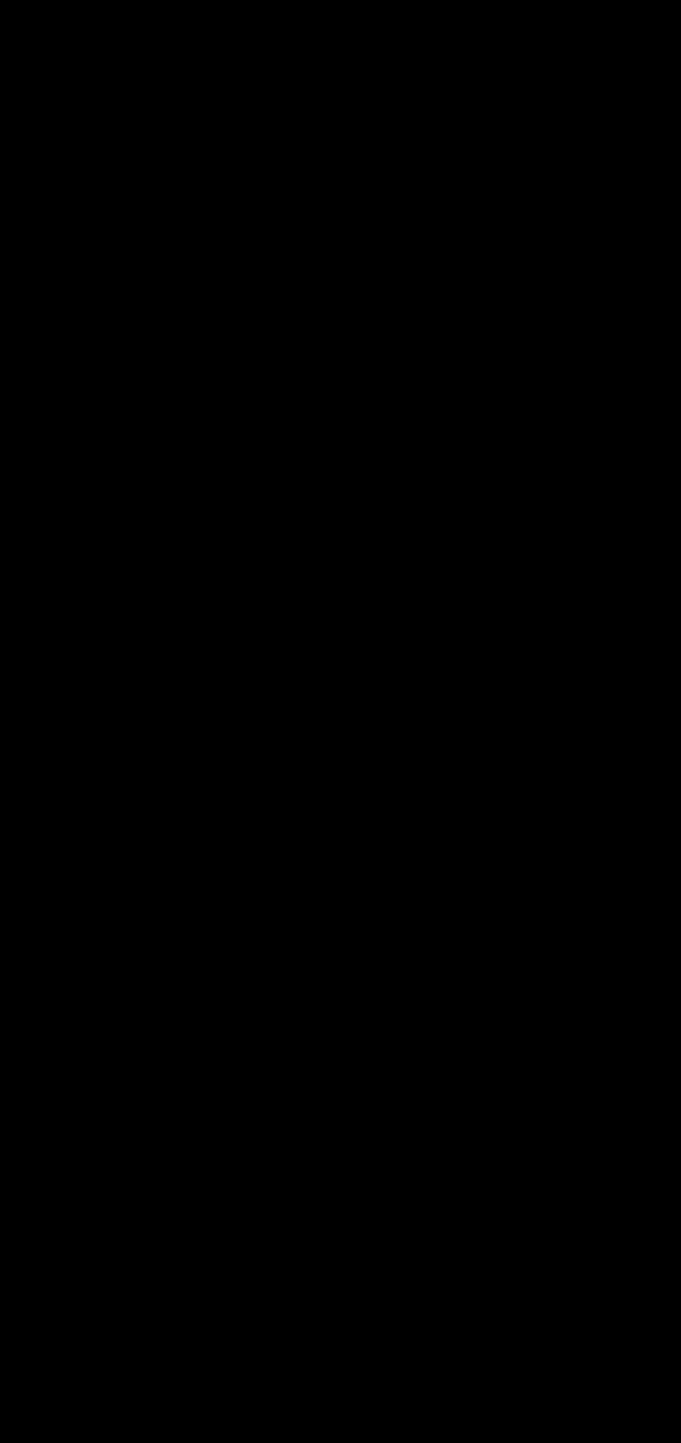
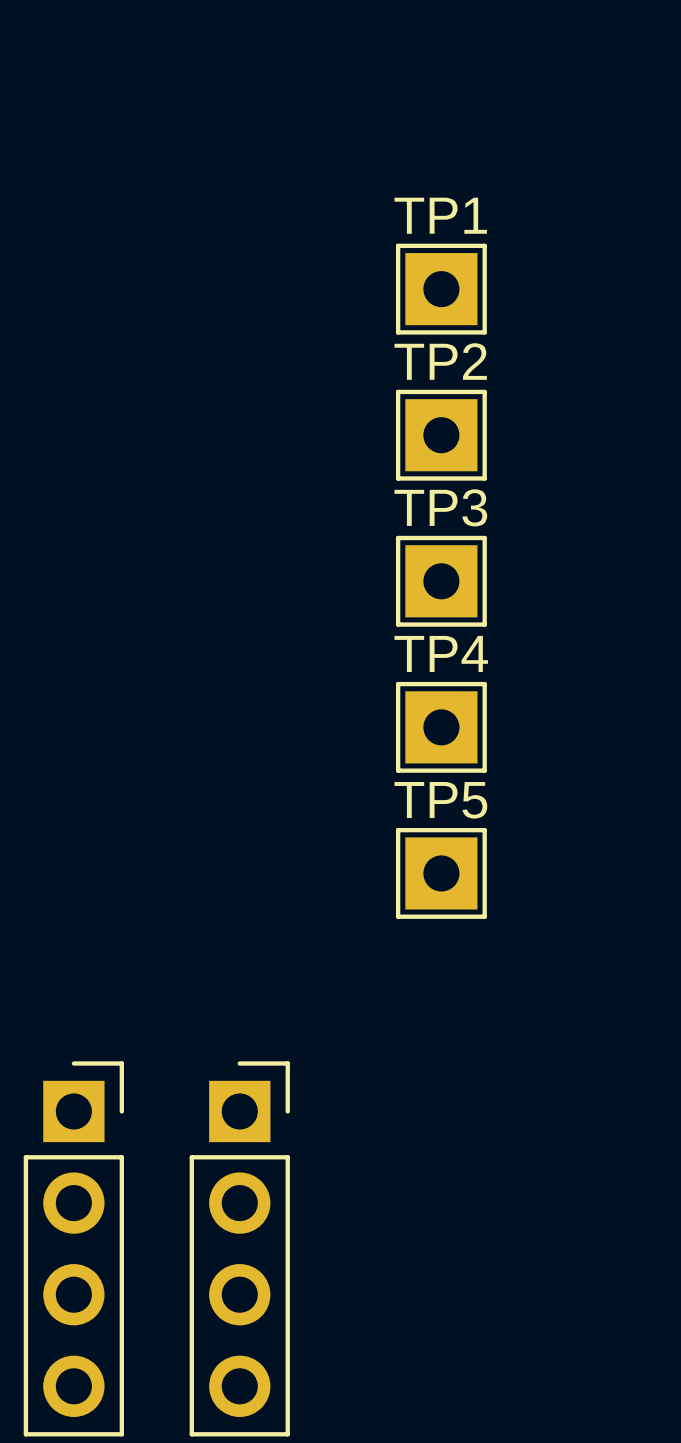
TP1: none -> (441, 289)
TP2: none -> (441, 435)
TP3: none -> (441, 581)
TP4: none -> (441, 727)
TP5: none -> (441, 873)
part: none -> (73, 1248)
part: none -> (239, 1248)

